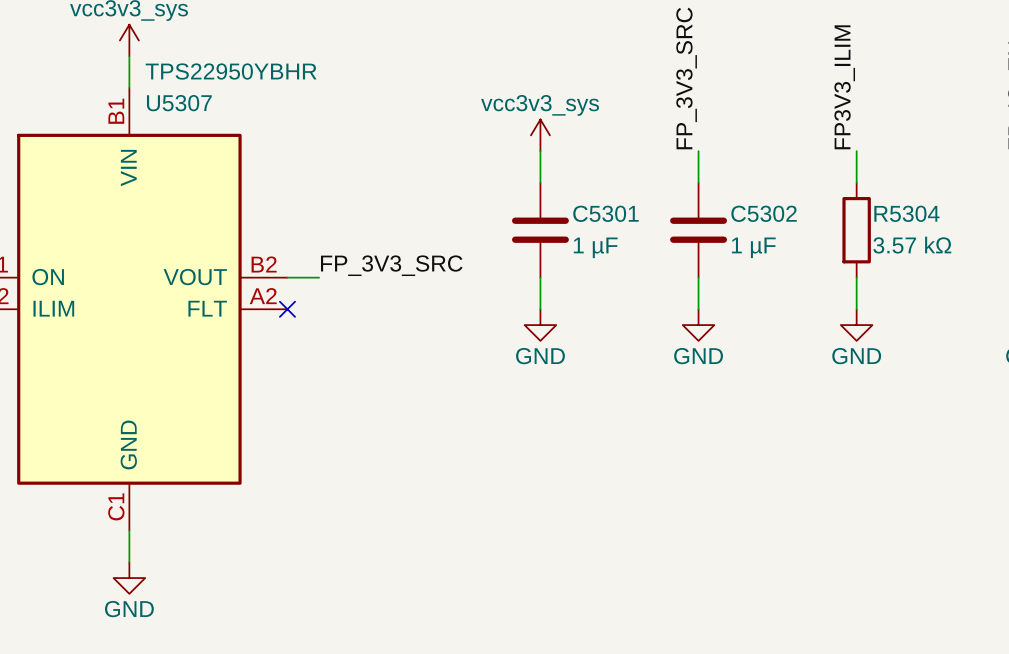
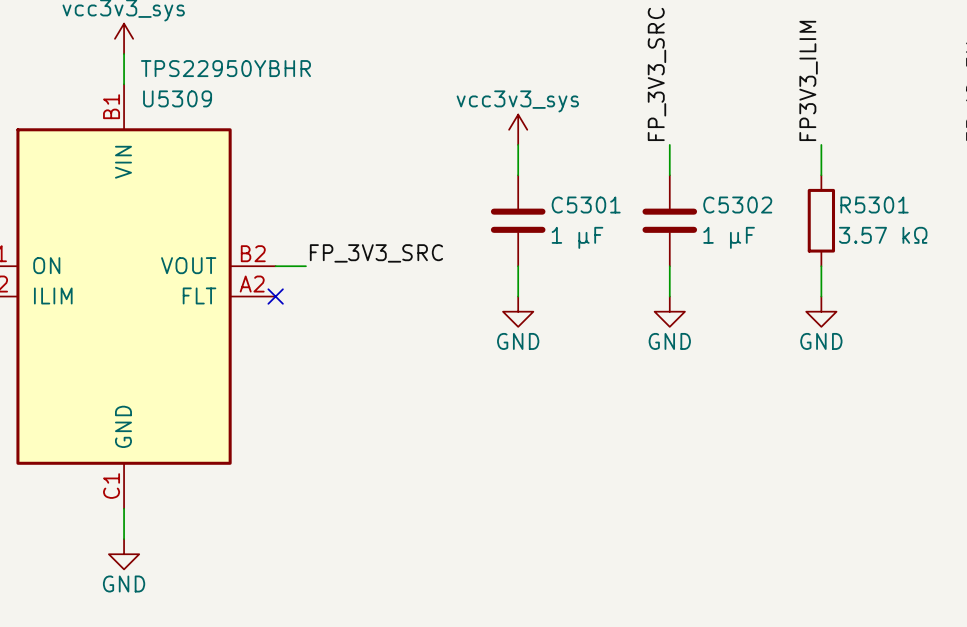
U5307 name: U5307 (179, 103) -> U5309 (177, 98)
R5304 name: R5304 (906, 213) -> R5301 (874, 205)

